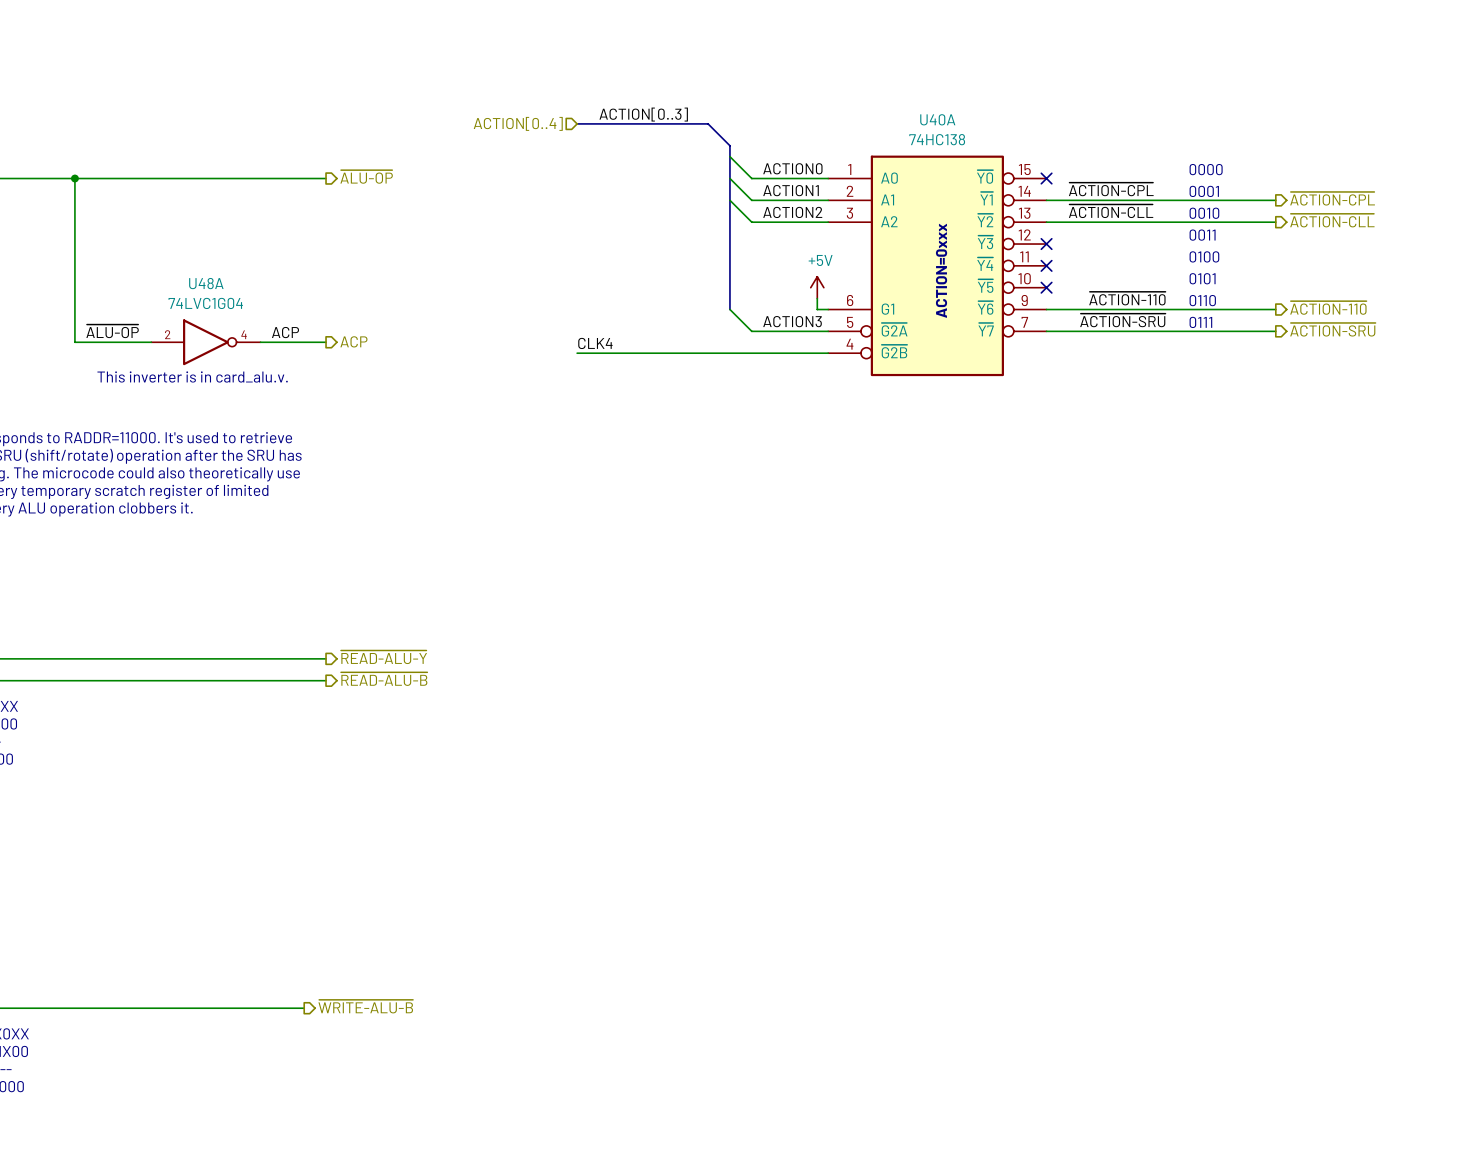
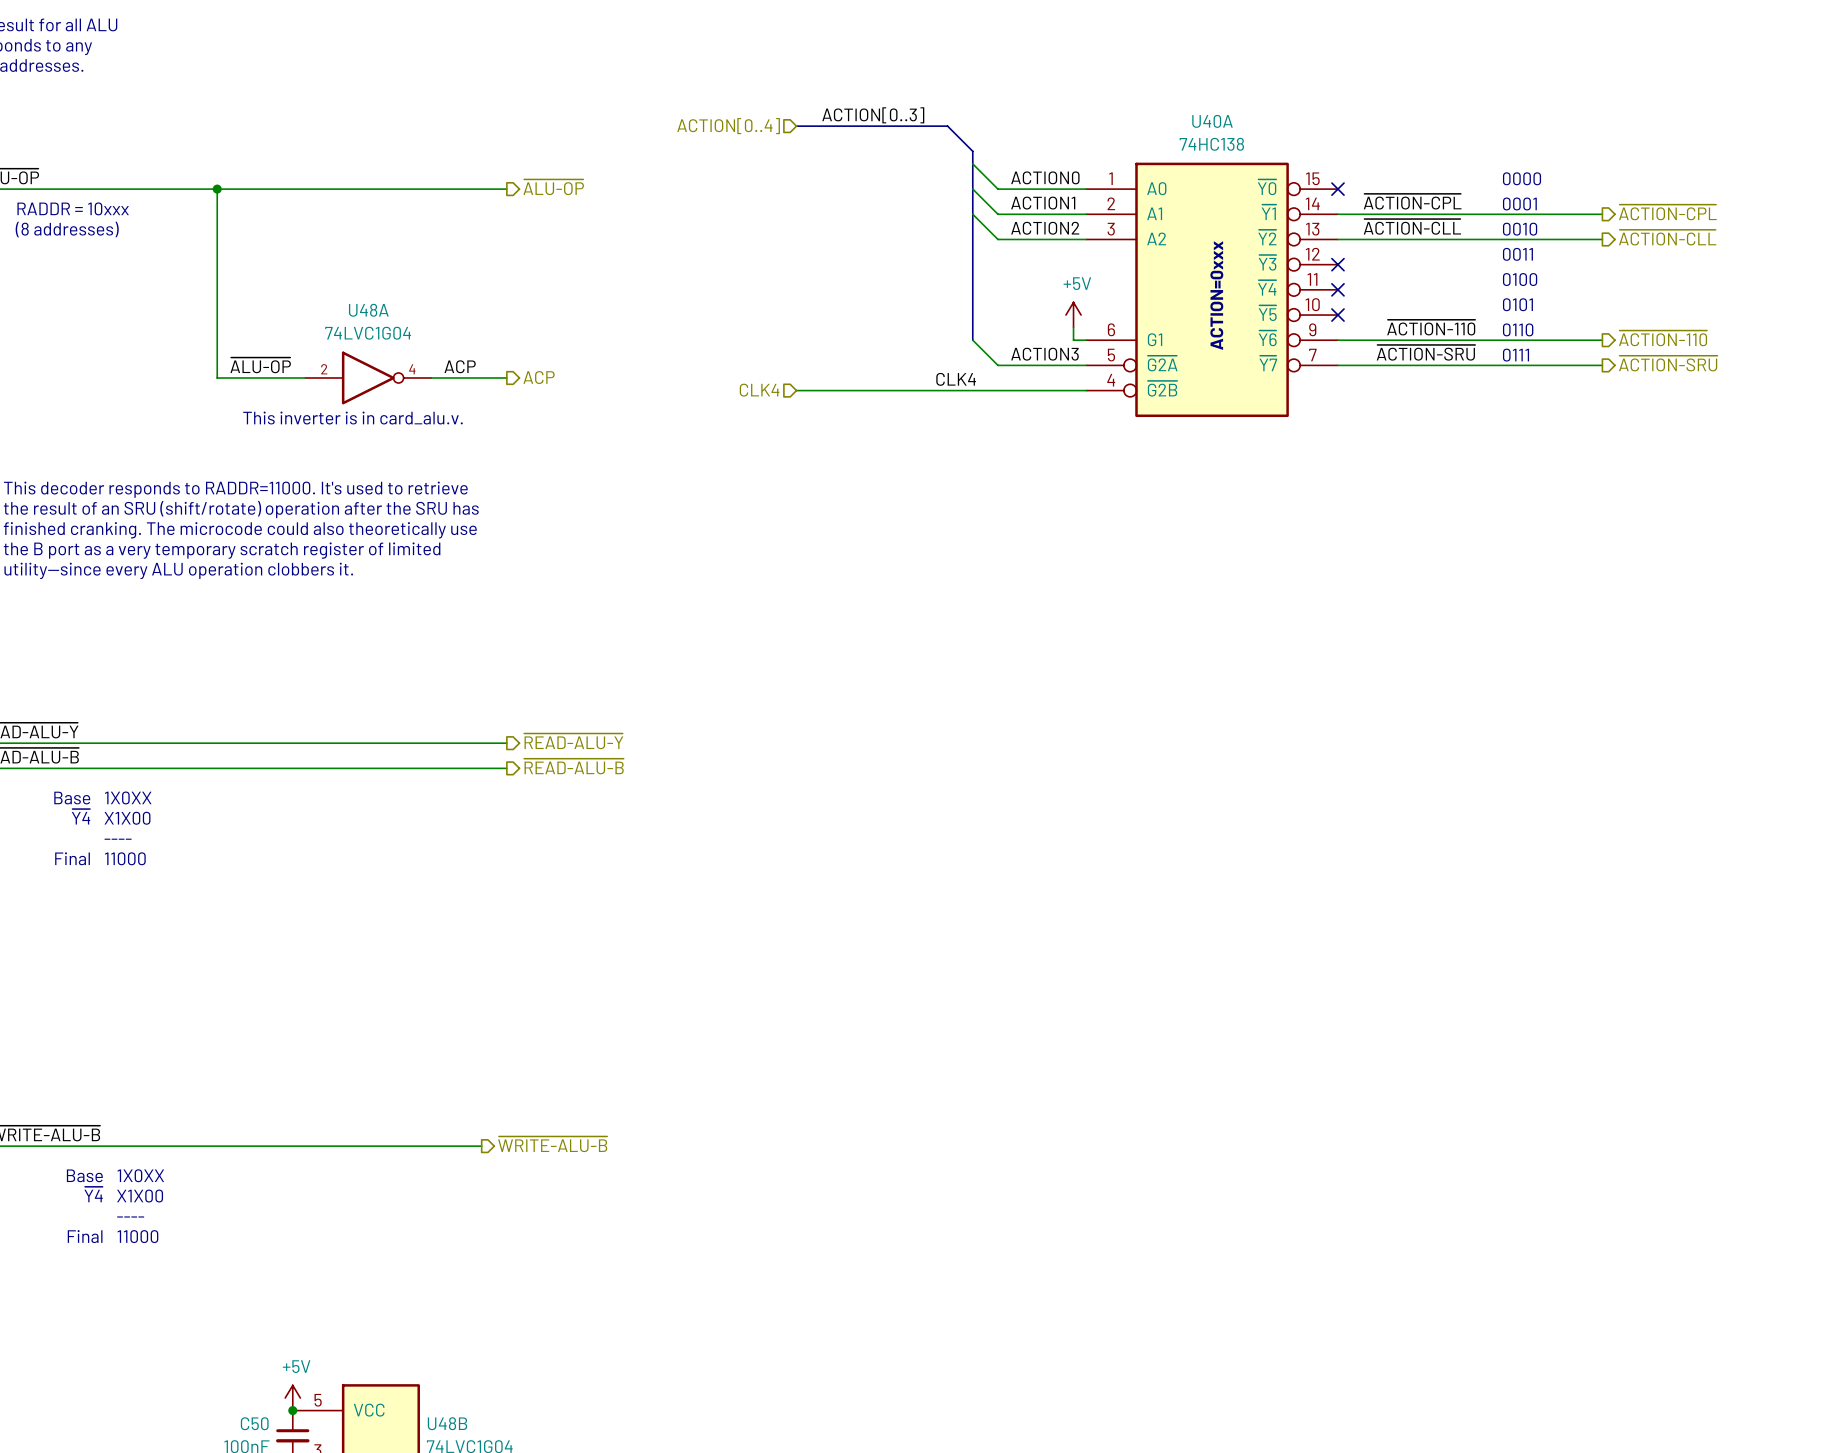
label position: CLK4 (595, 343) -> CLK4 (956, 379)
hierarchical label: none -> CLK4 (759, 390)

